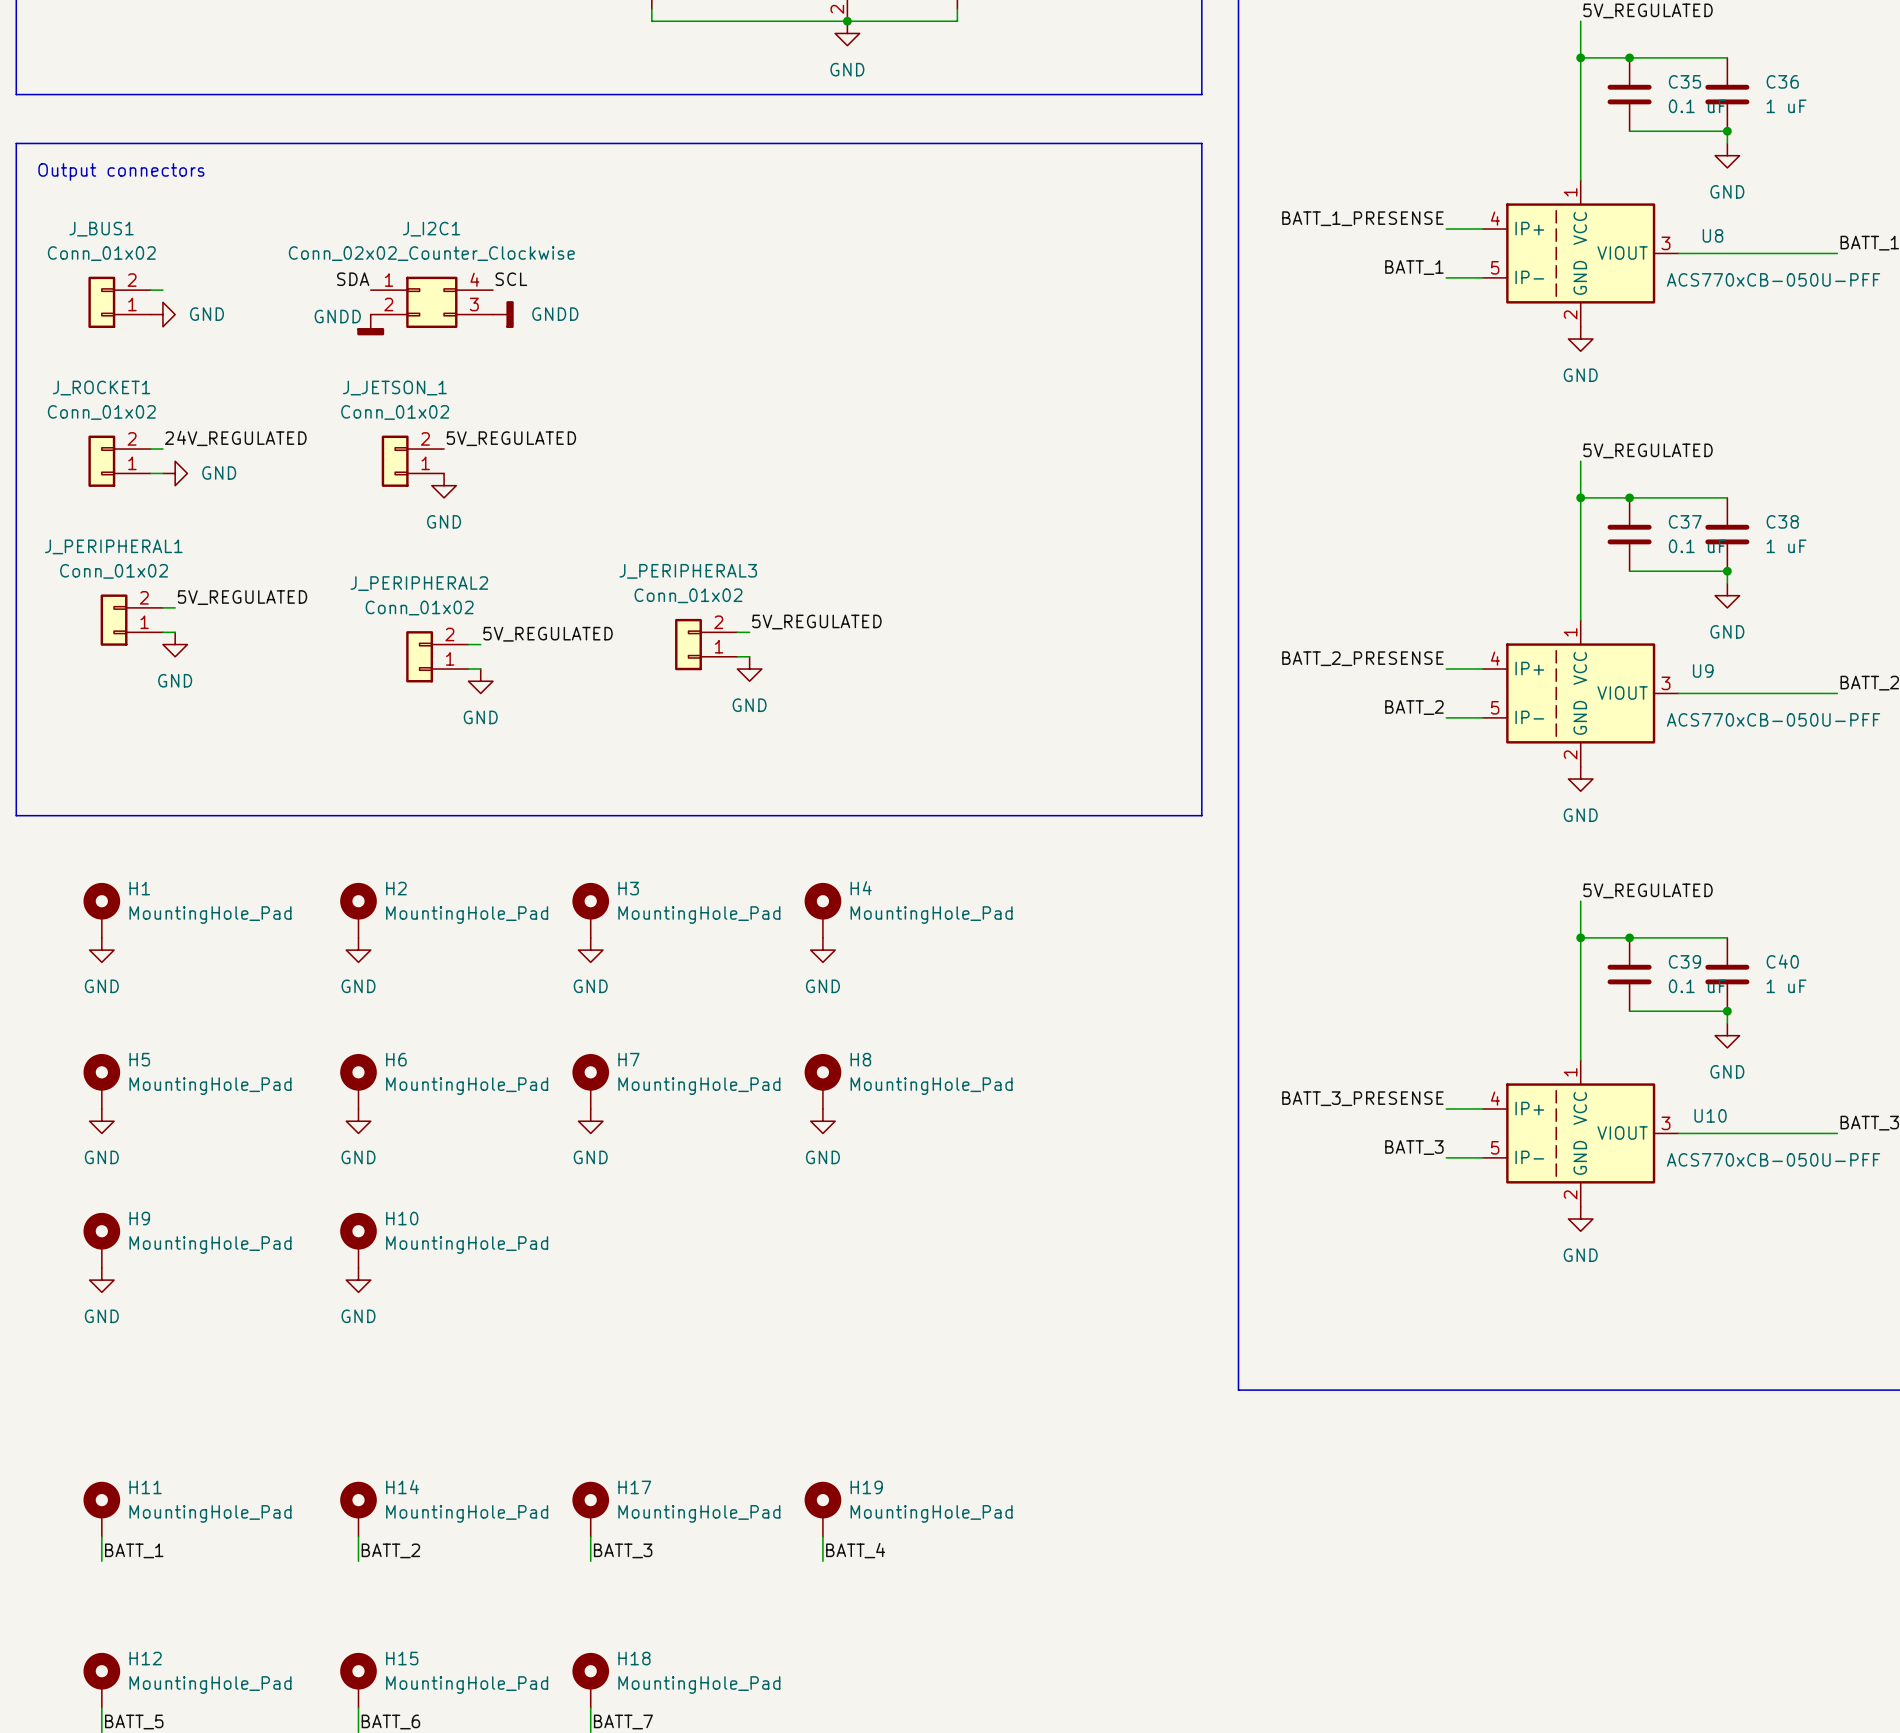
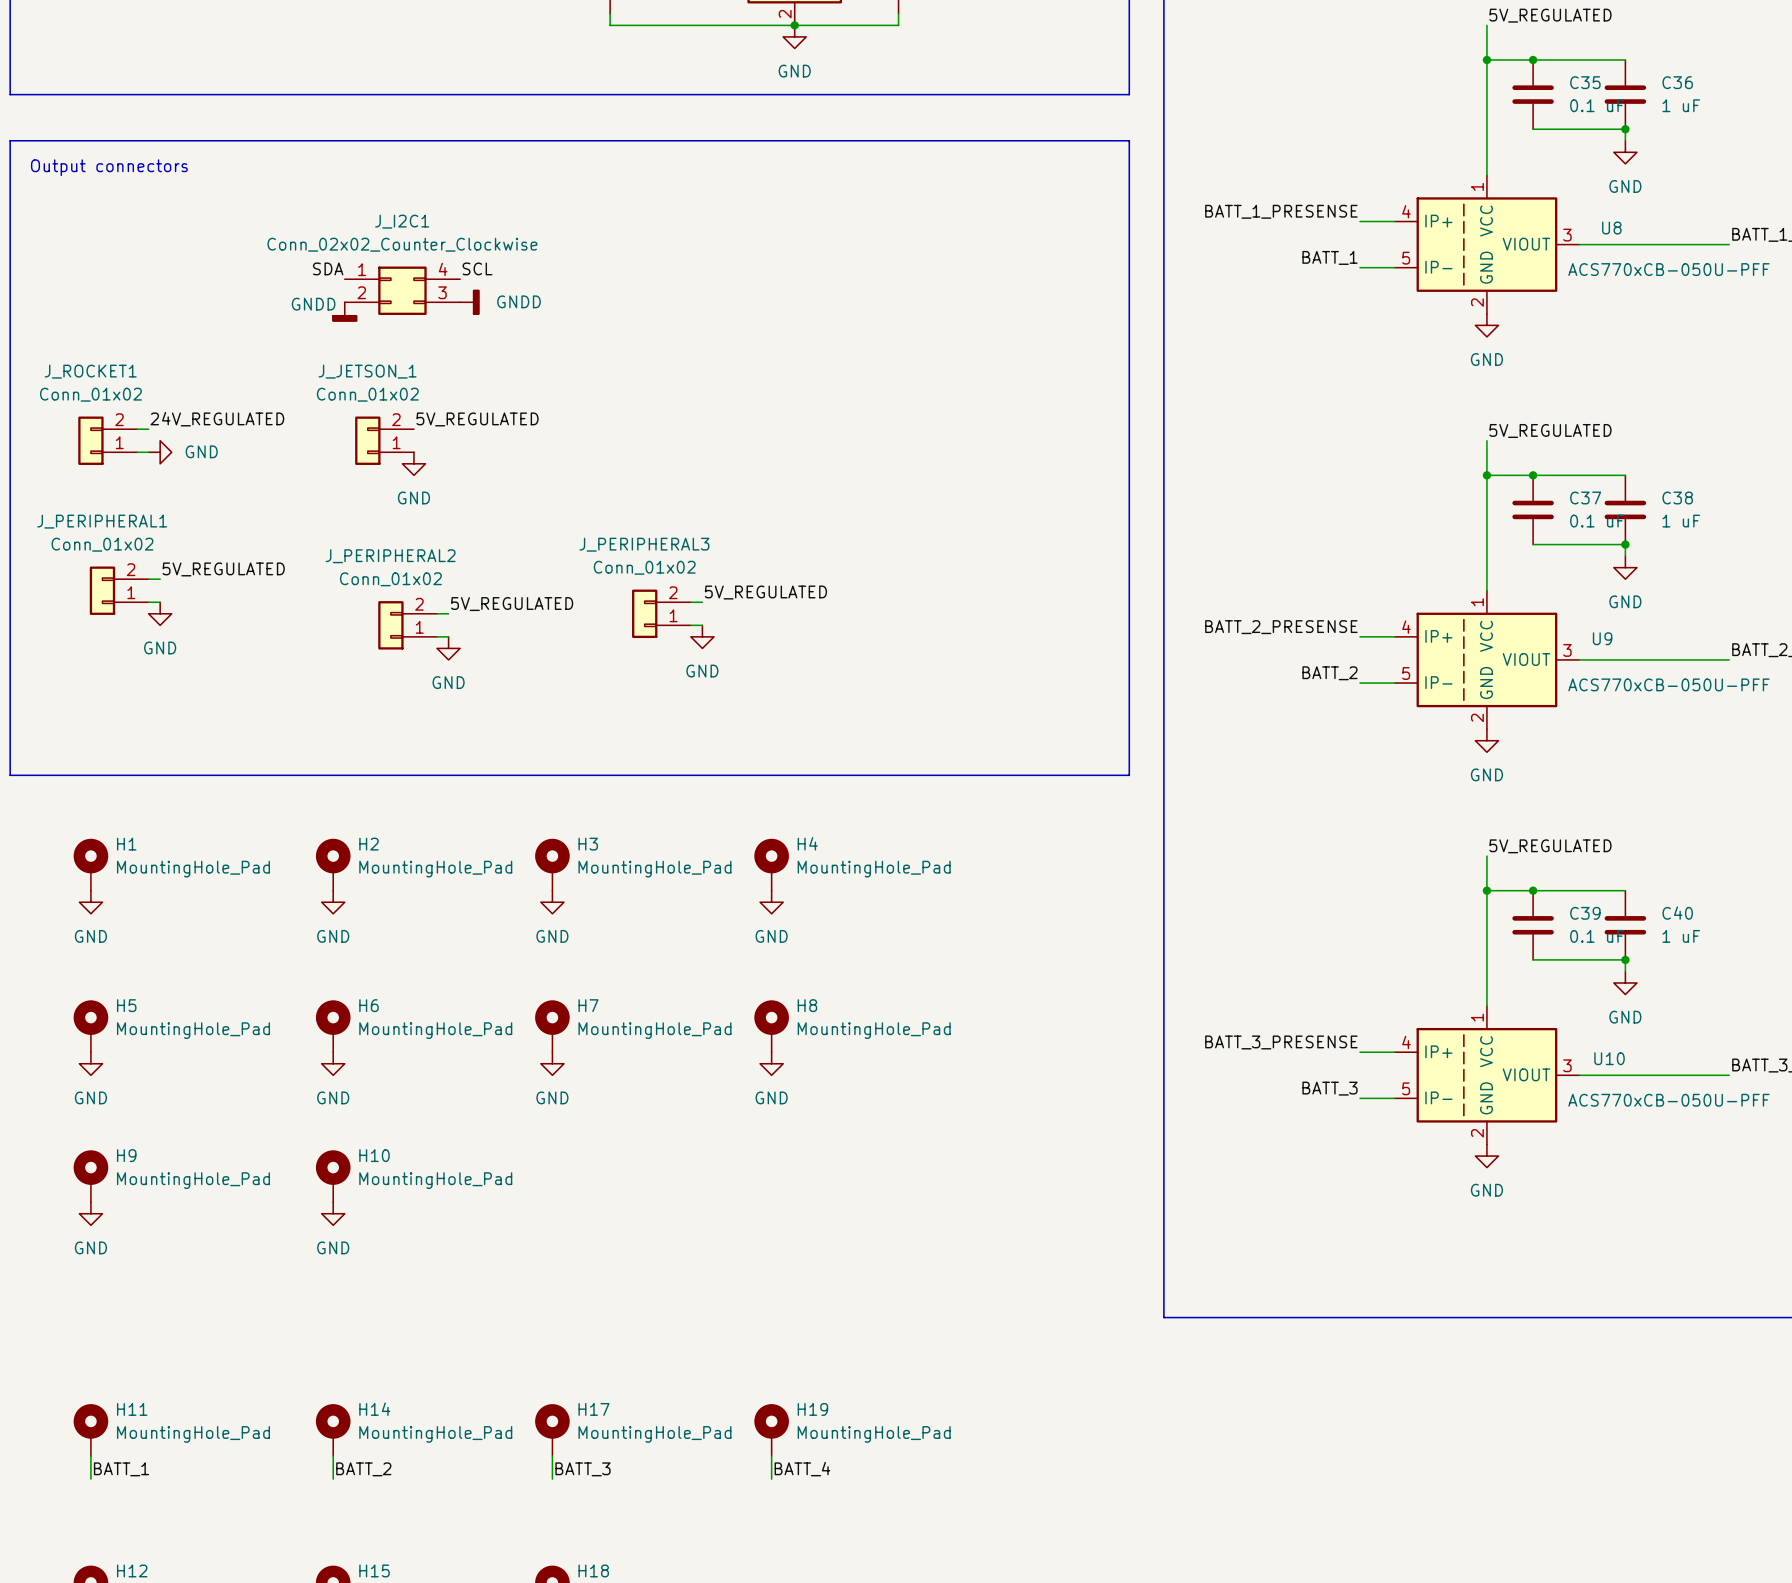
wire: (150, 290) (162, 290) -> none
J_BUS1: Conn_01x02 (119, 302) -> none
power symbol: GND (162, 314) -> none

